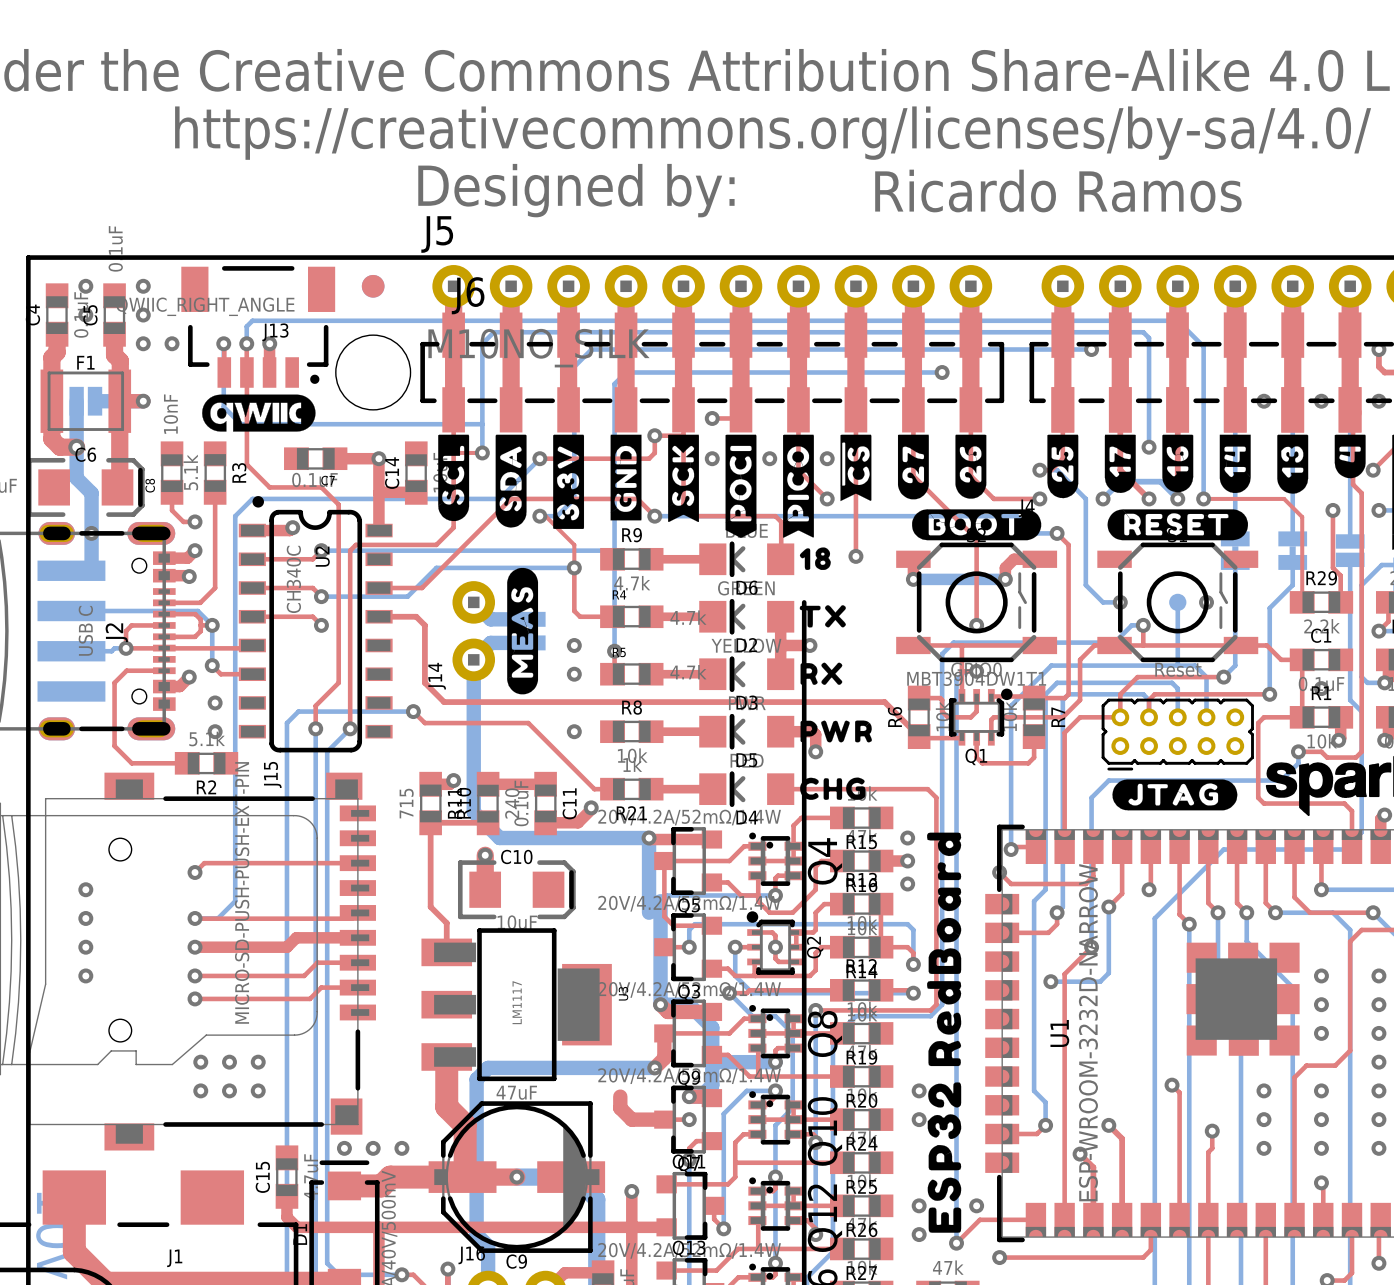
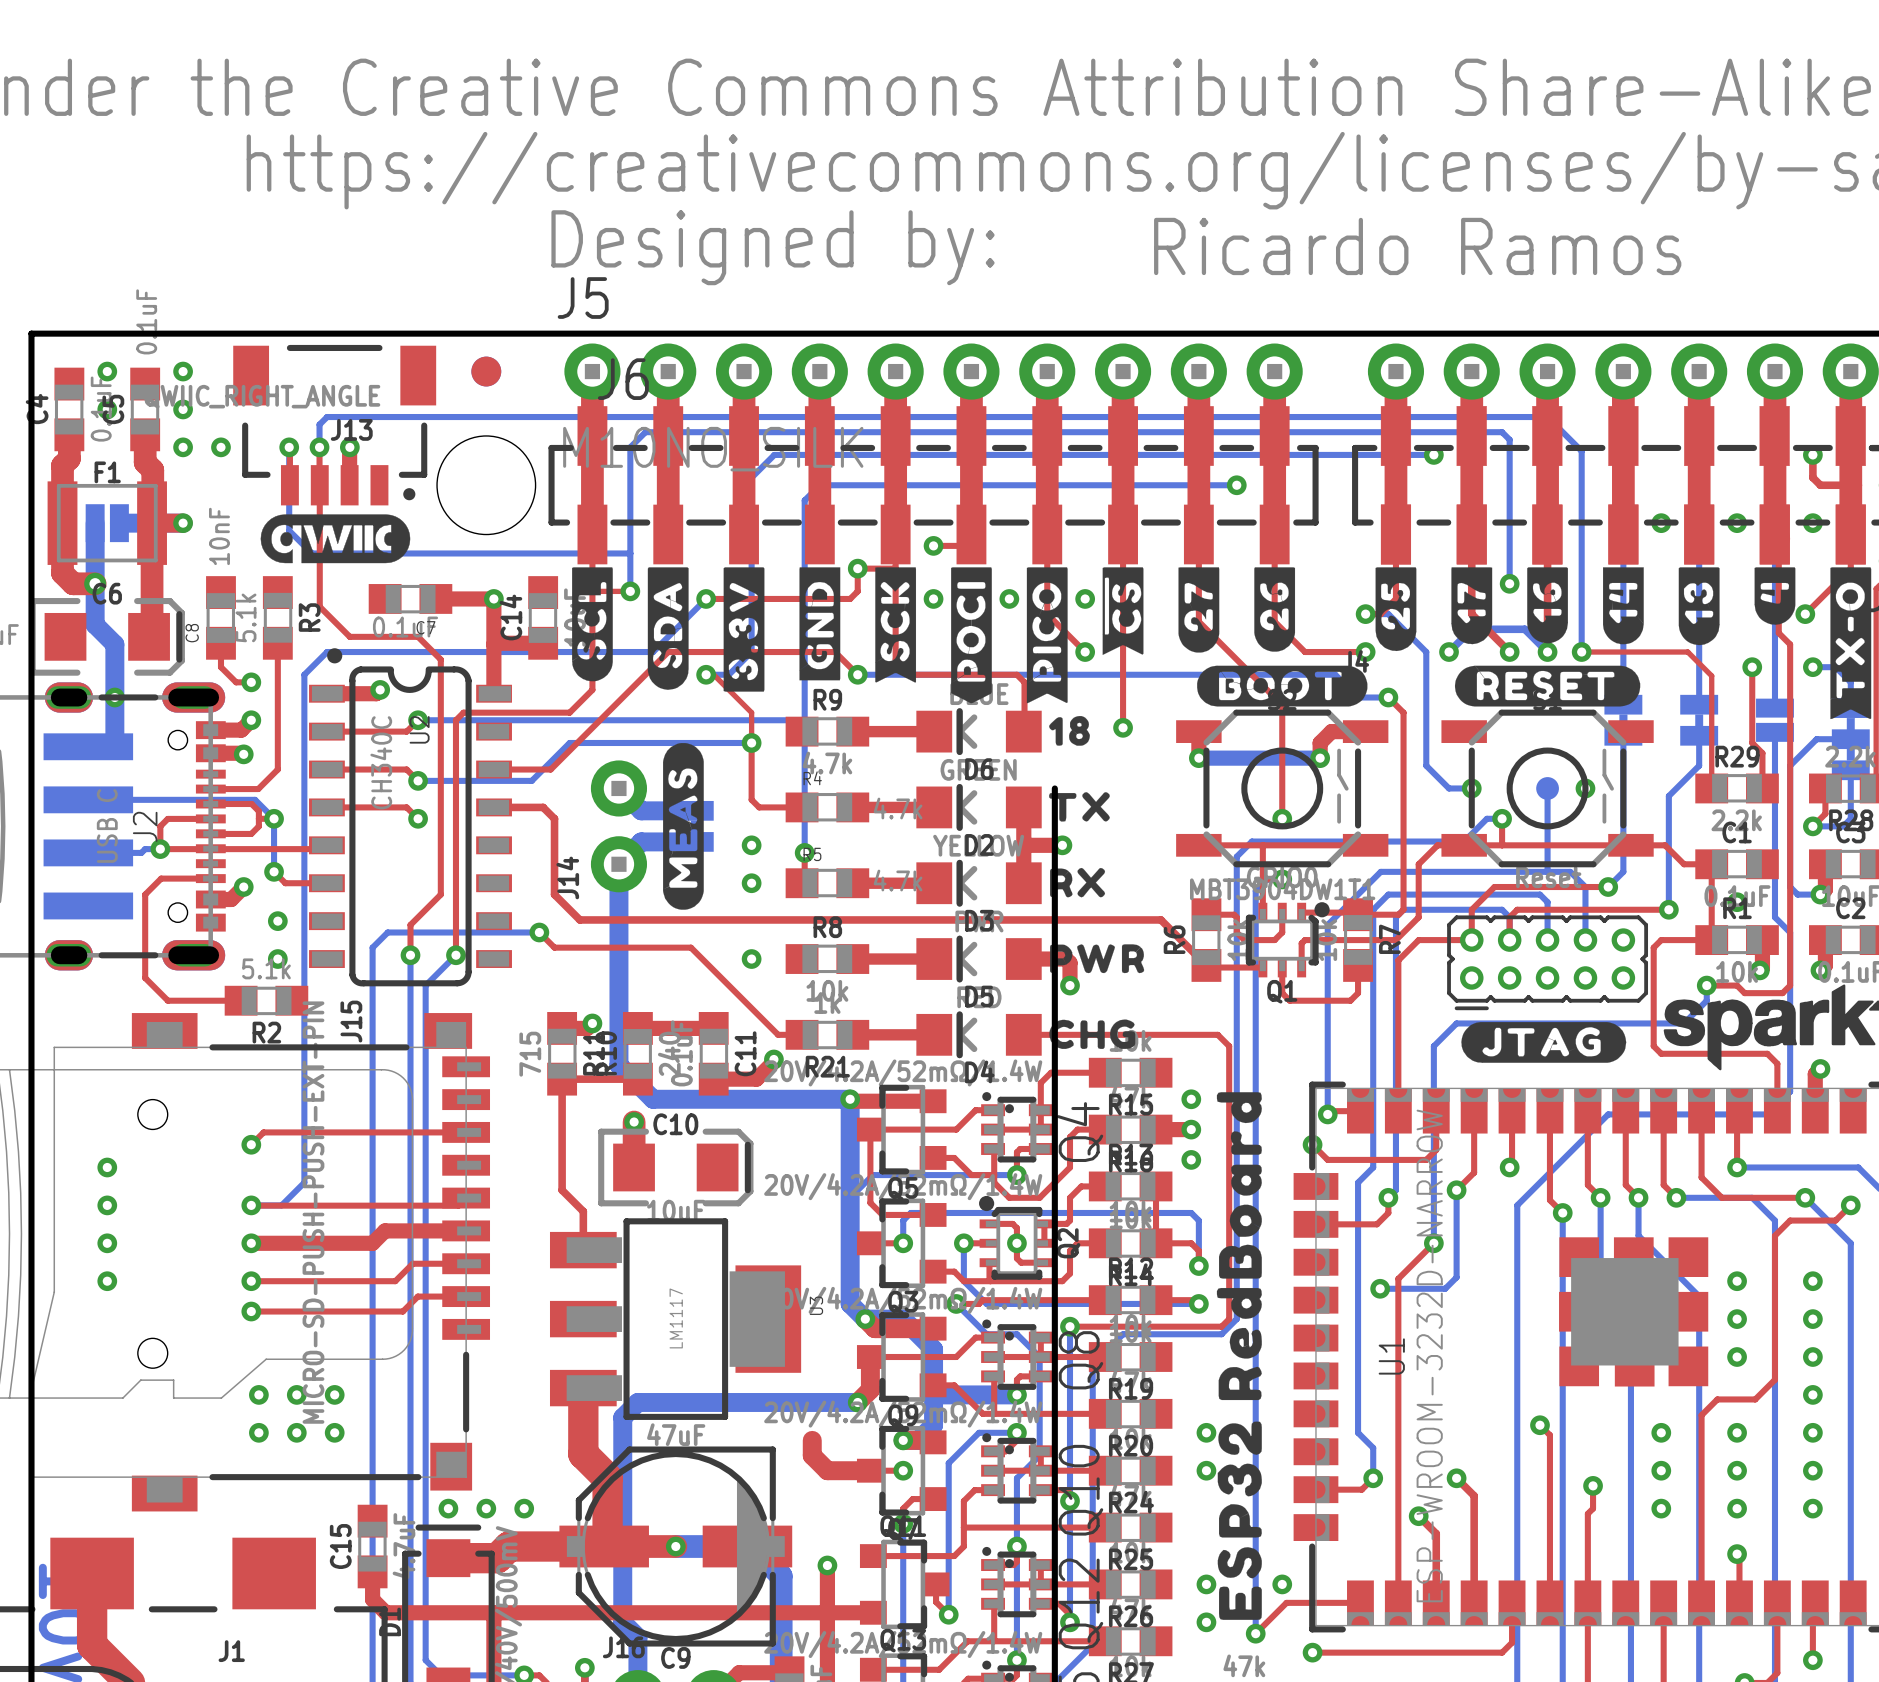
bottom track: (660, 901) (660, 1004) -> (850, 1197) (850, 1303) (865, 1319)

